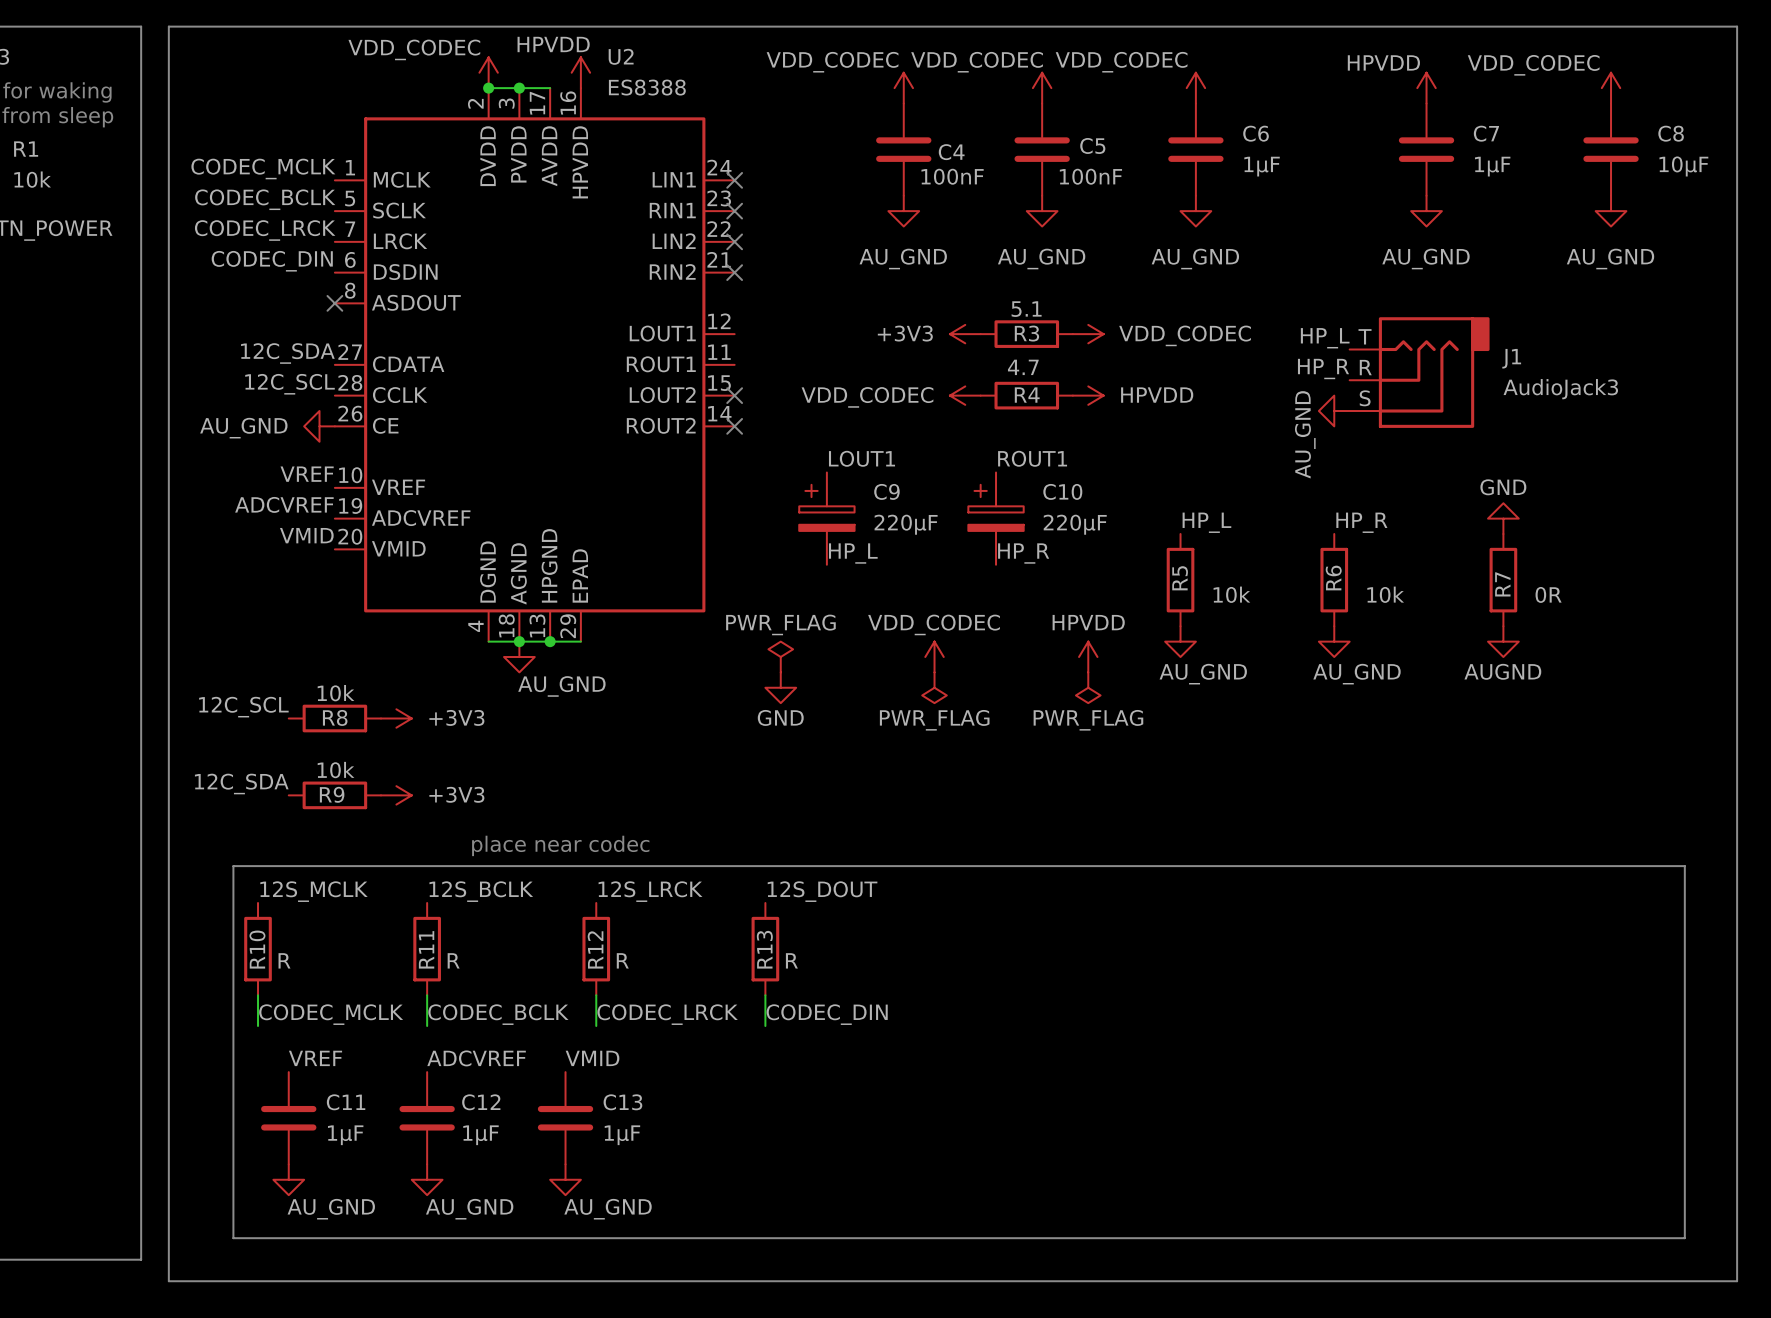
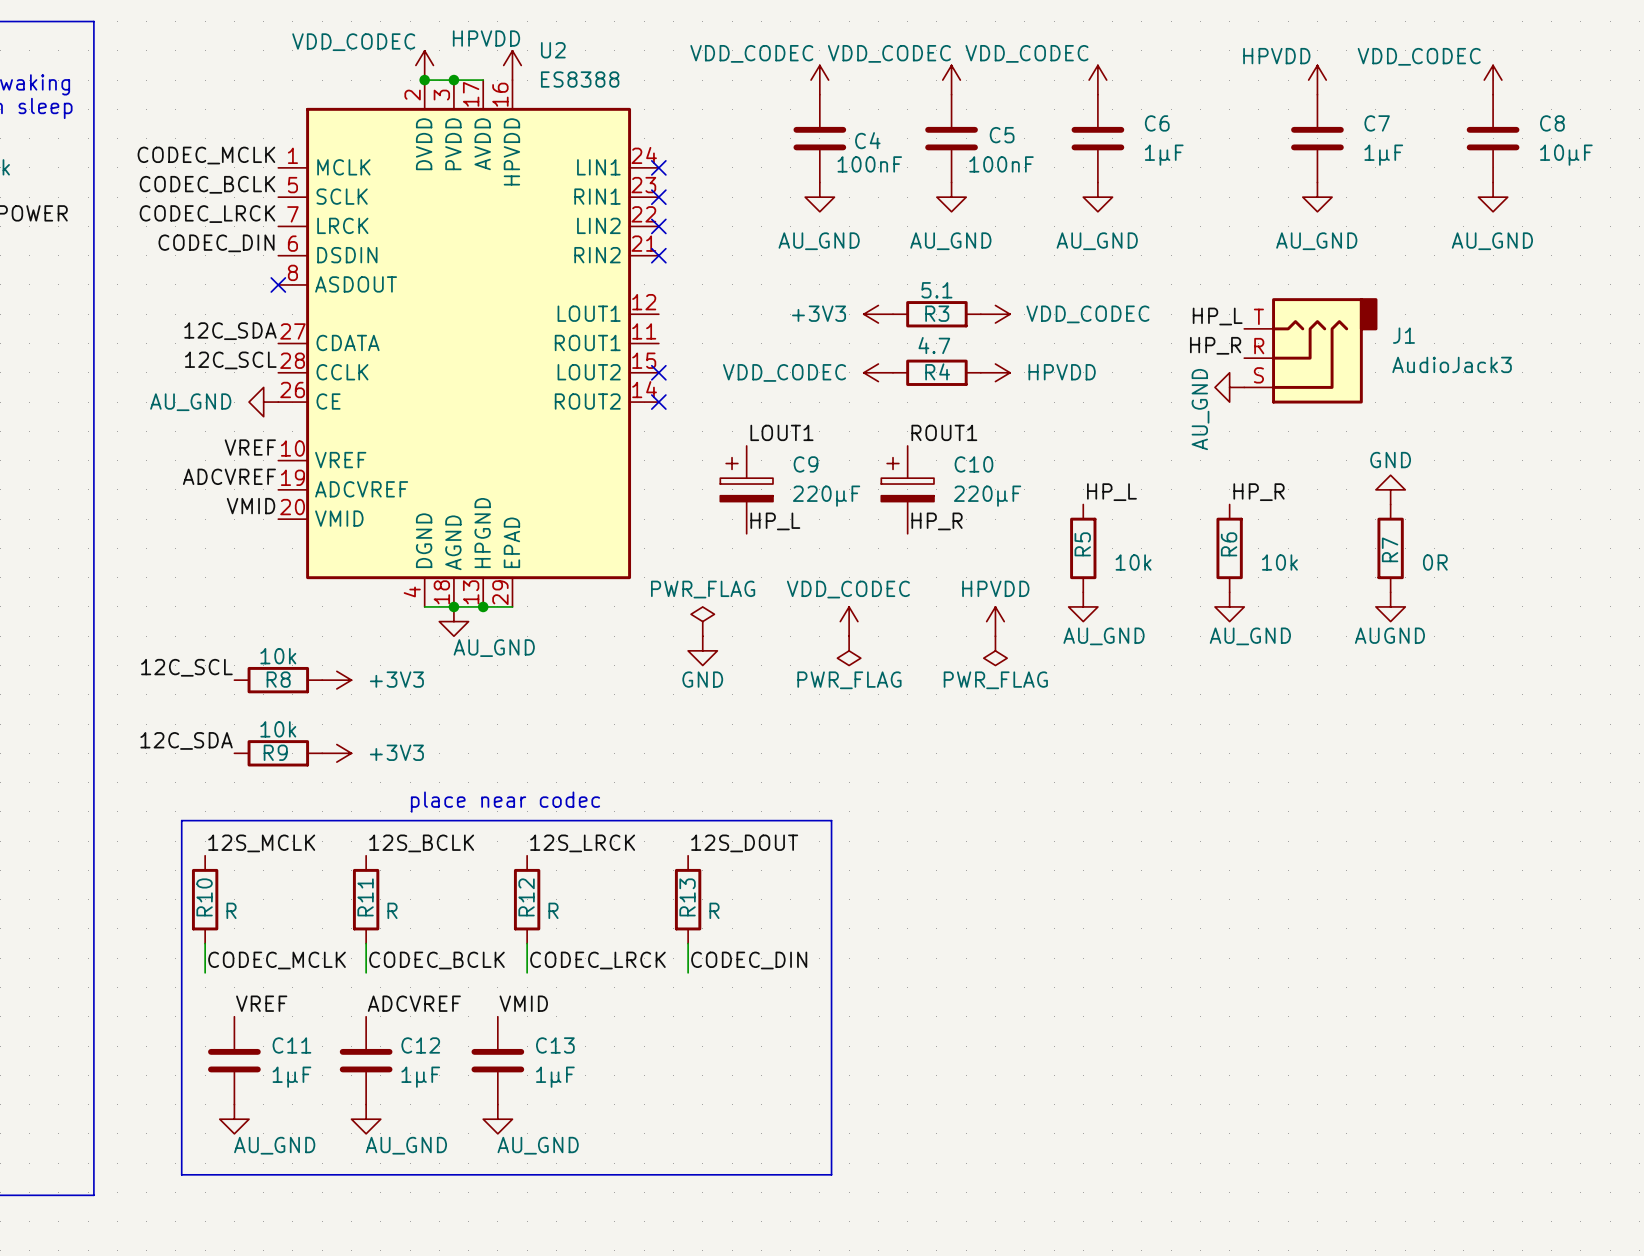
line: (168, 26) (1737, 26) (1737, 1281) (168, 1281) (168, 26) -> none
line: (916, 866) (1684, 866) (1684, 1238) (916, 1238) -> (831, 820) (831, 1174)

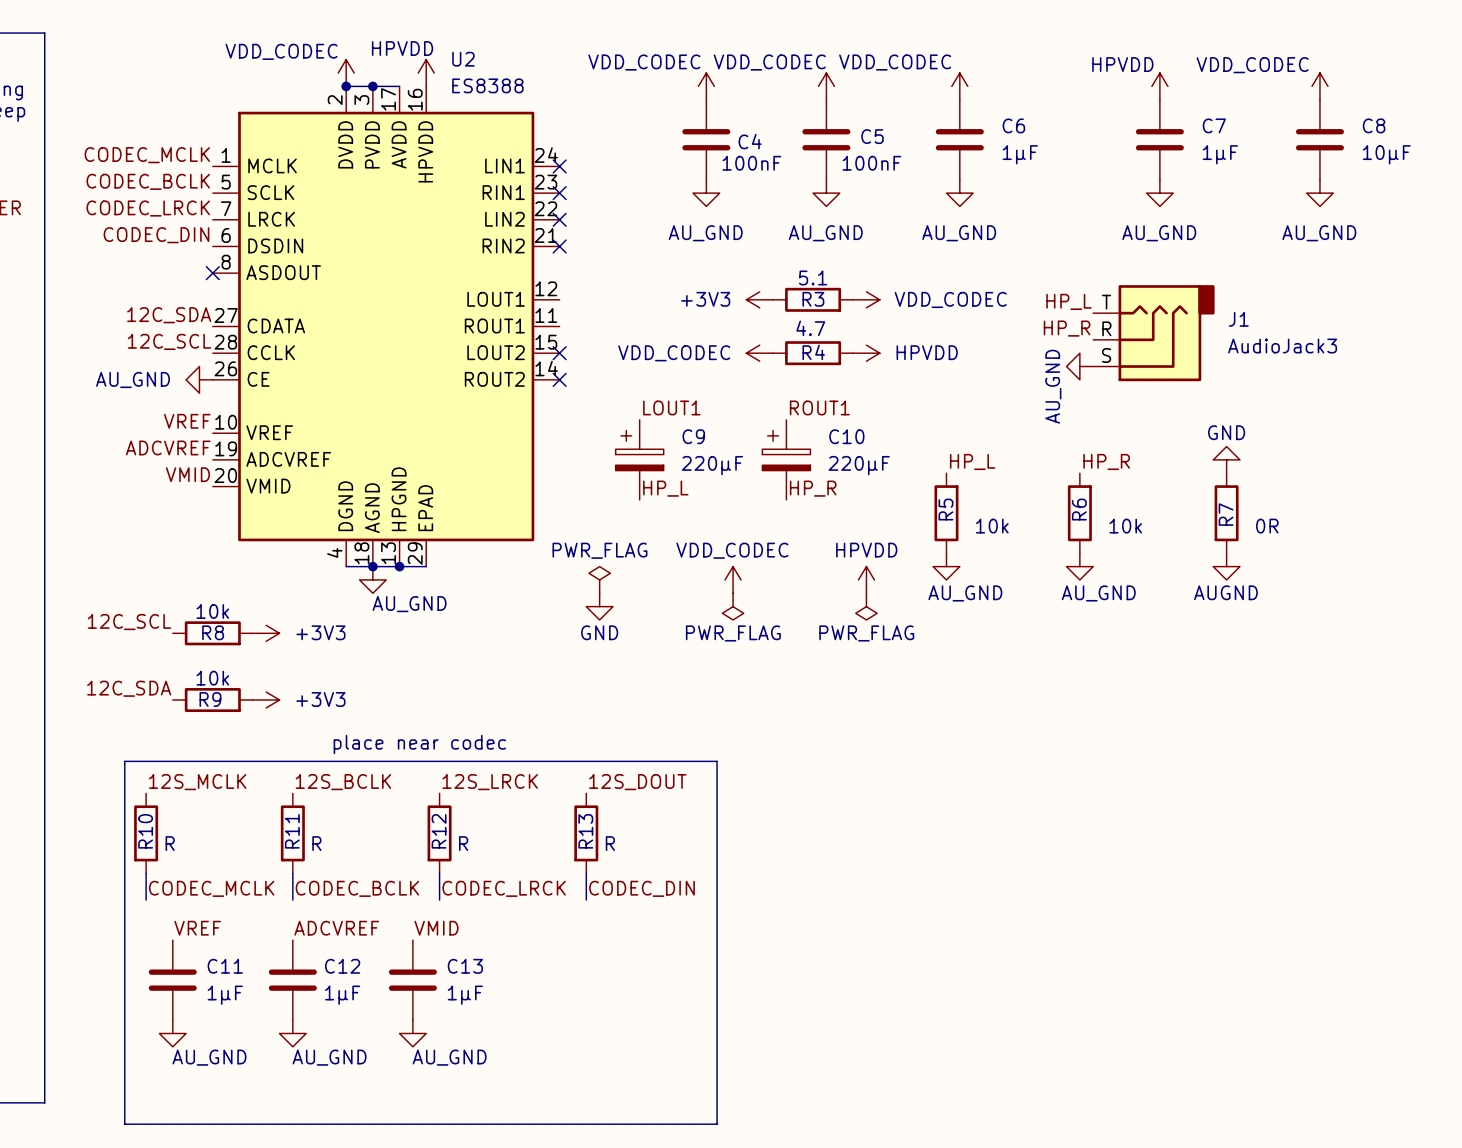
line: (181, 1174) (831, 1174) -> (124, 1084) (124, 1124) (717, 1124) (717, 1084)

